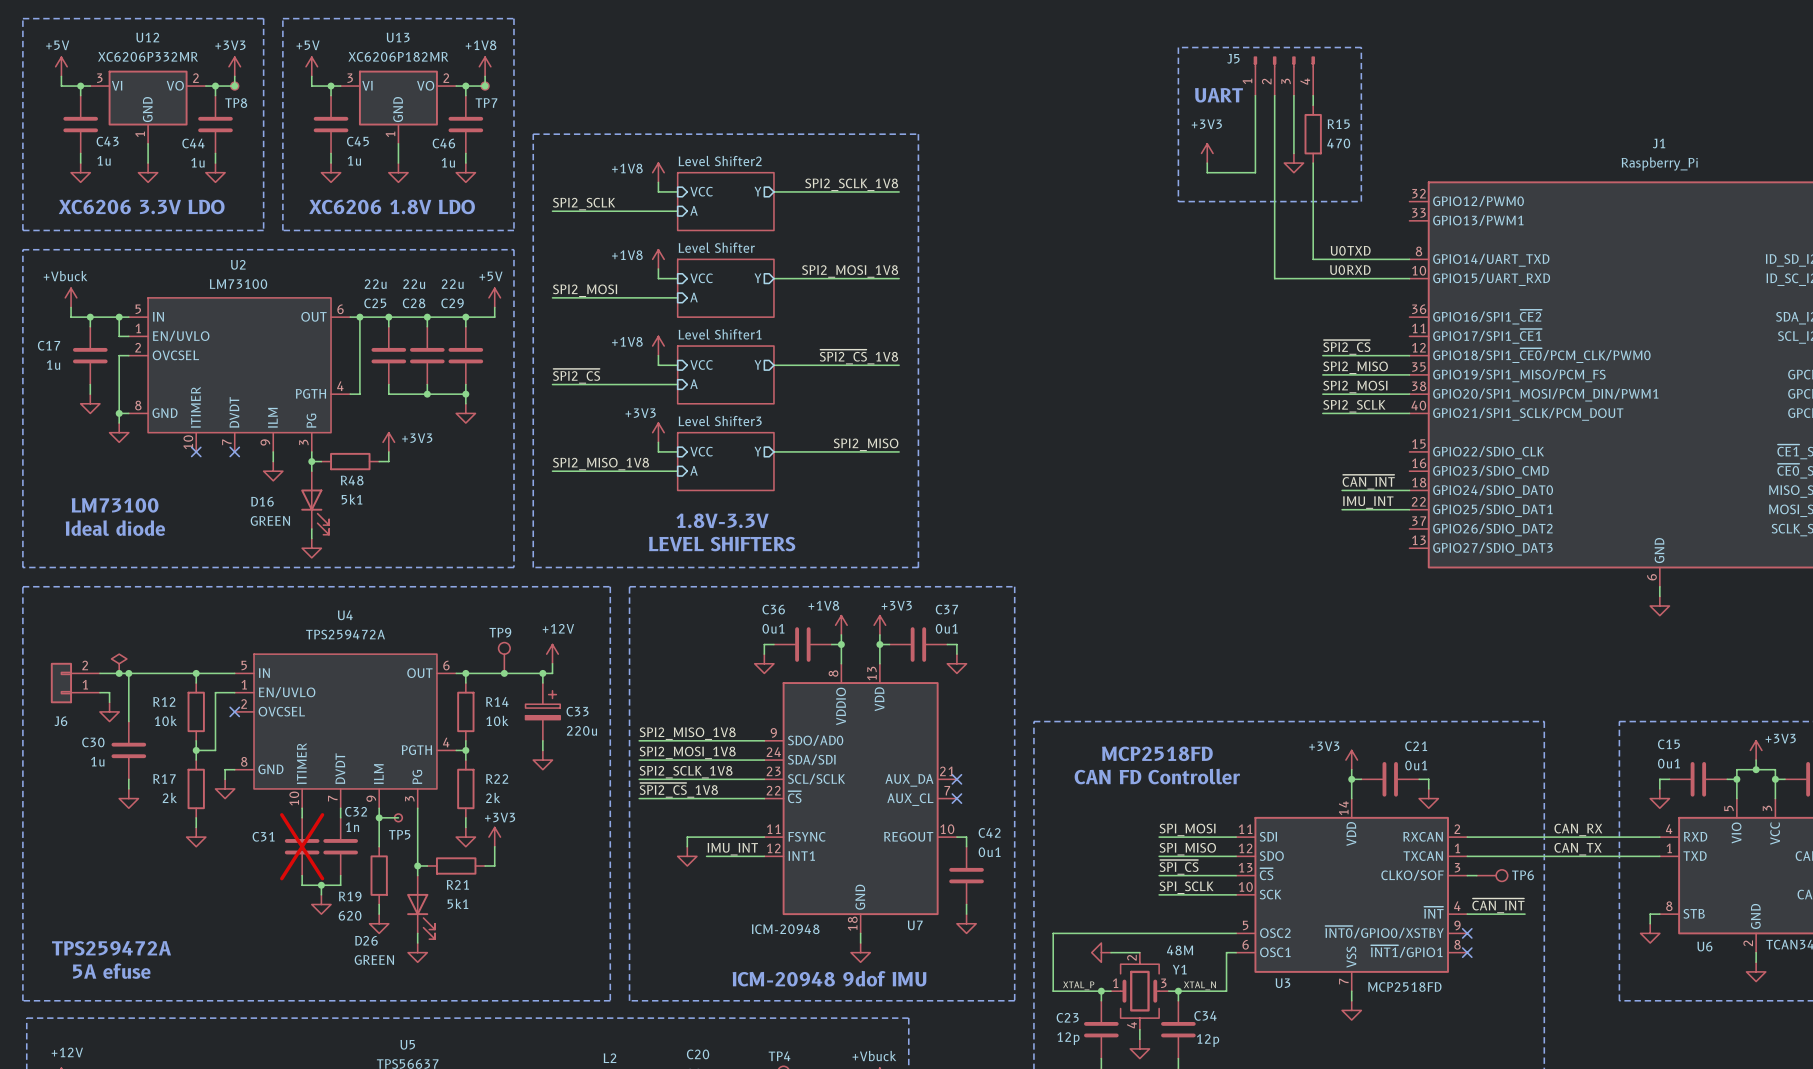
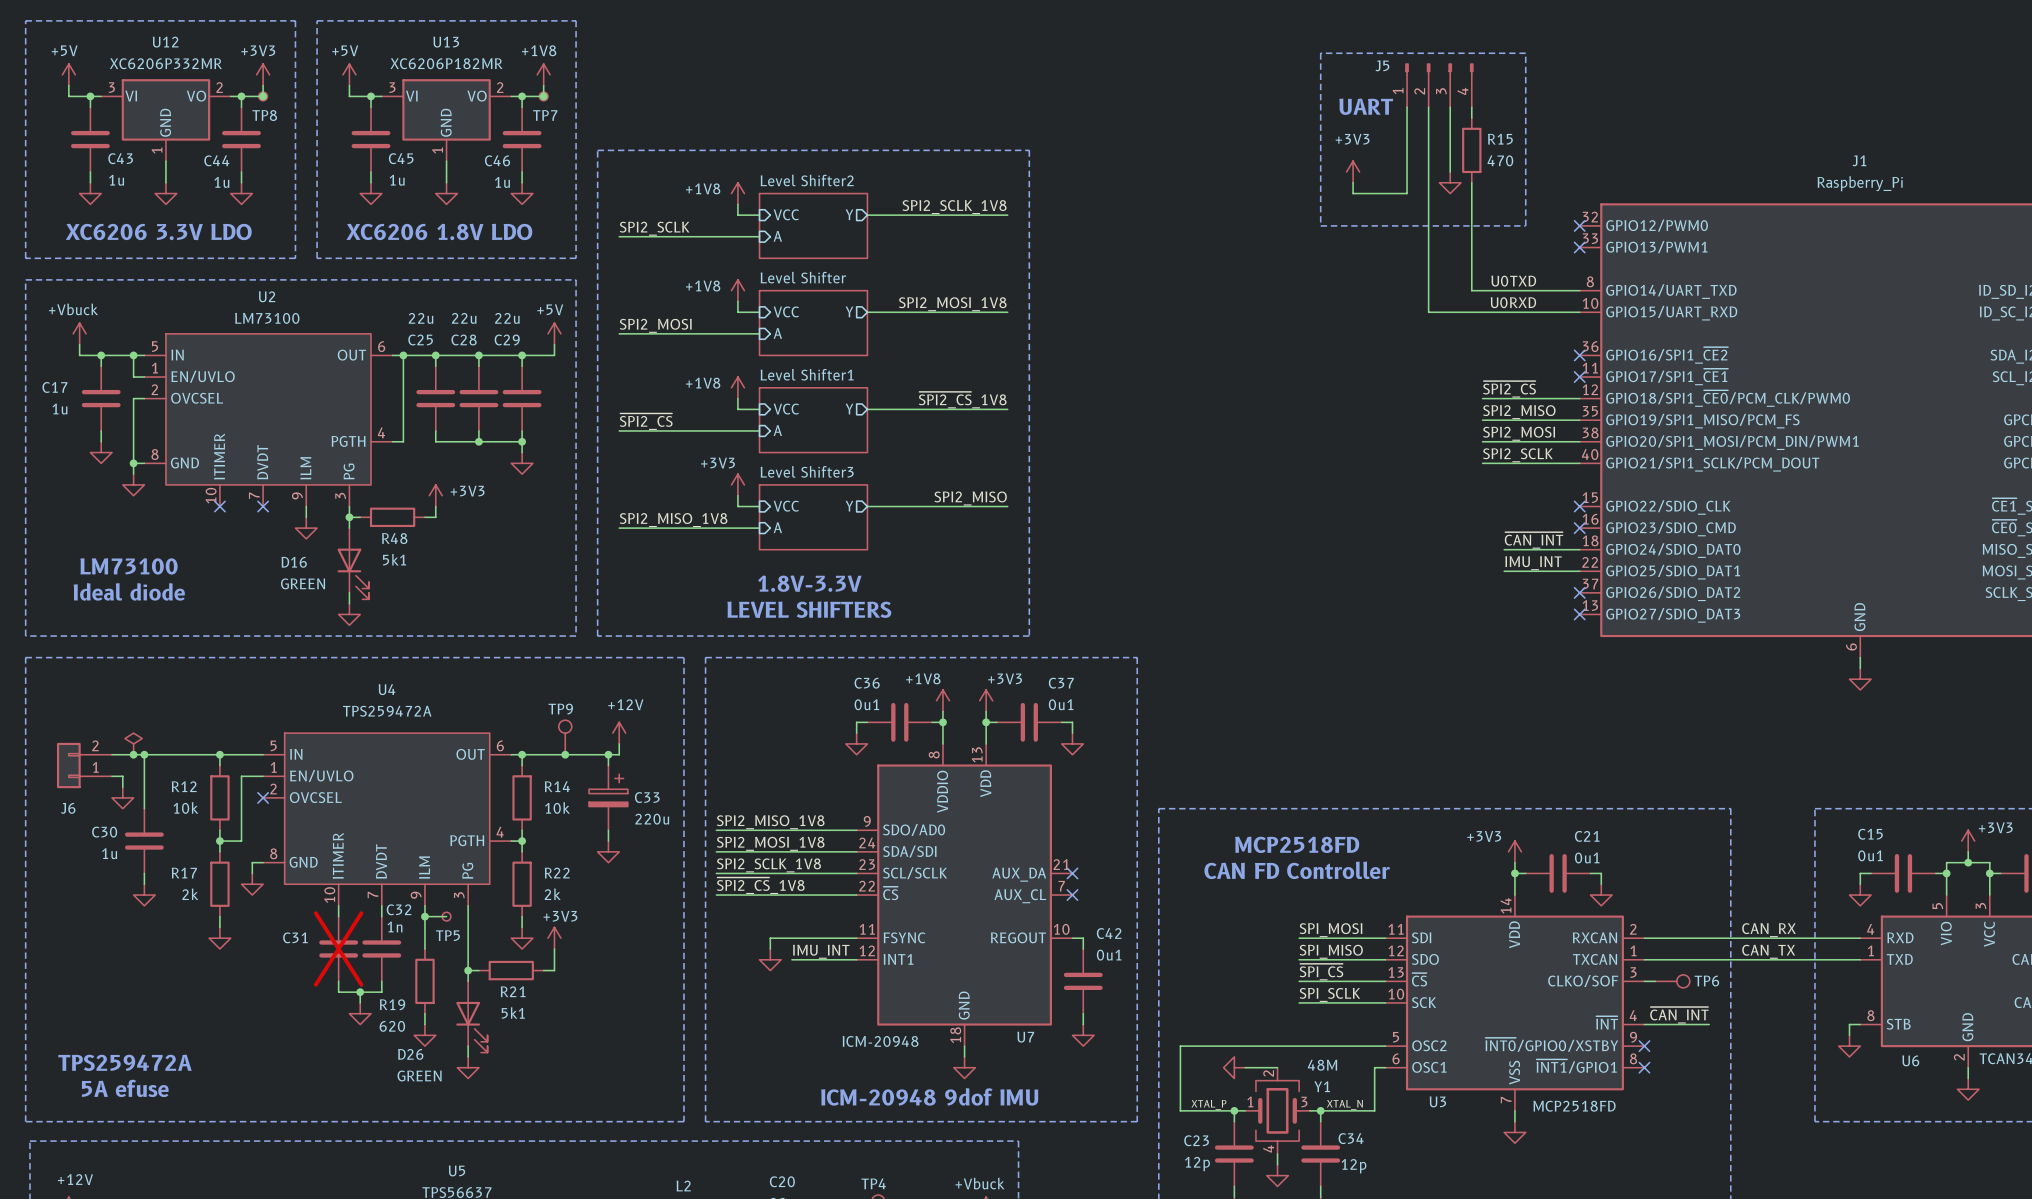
no-connect mark: none -> (1579, 225)
no-connect mark: none -> (1579, 247)
no-connect mark: none -> (1579, 355)
no-connect mark: none -> (1579, 377)
no-connect mark: none -> (1579, 506)
no-connect mark: none -> (1579, 528)
no-connect mark: none -> (1579, 592)
no-connect mark: none -> (1579, 614)

